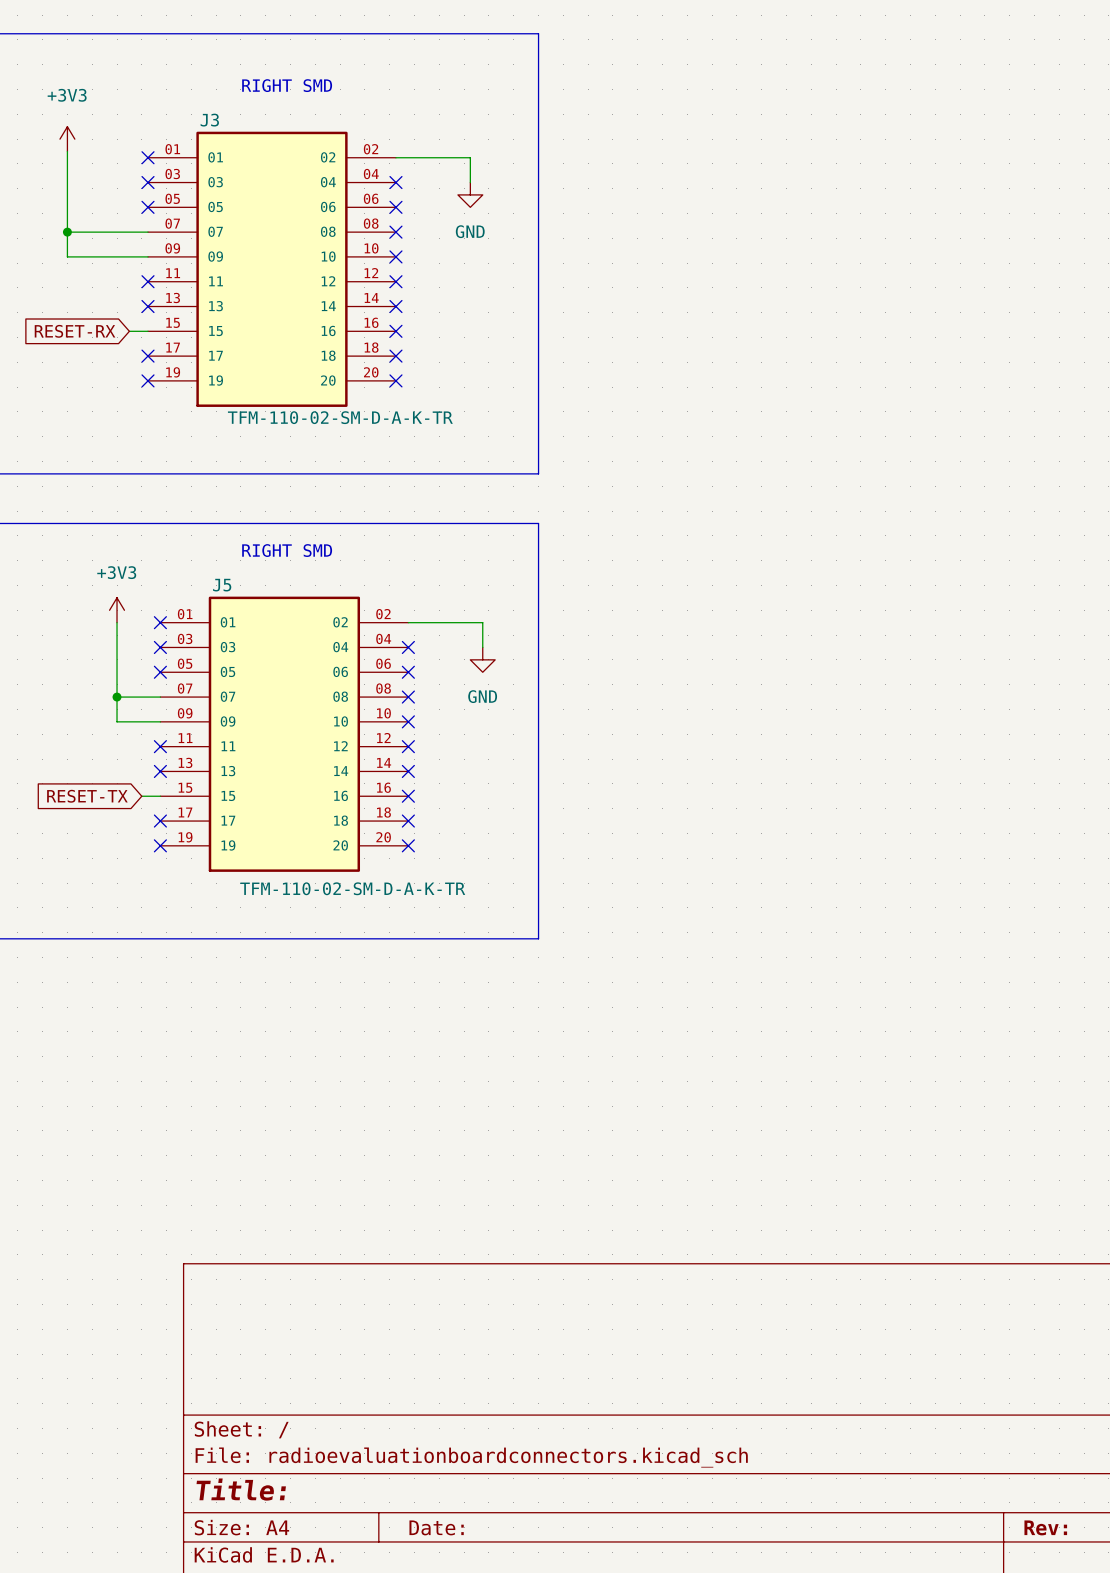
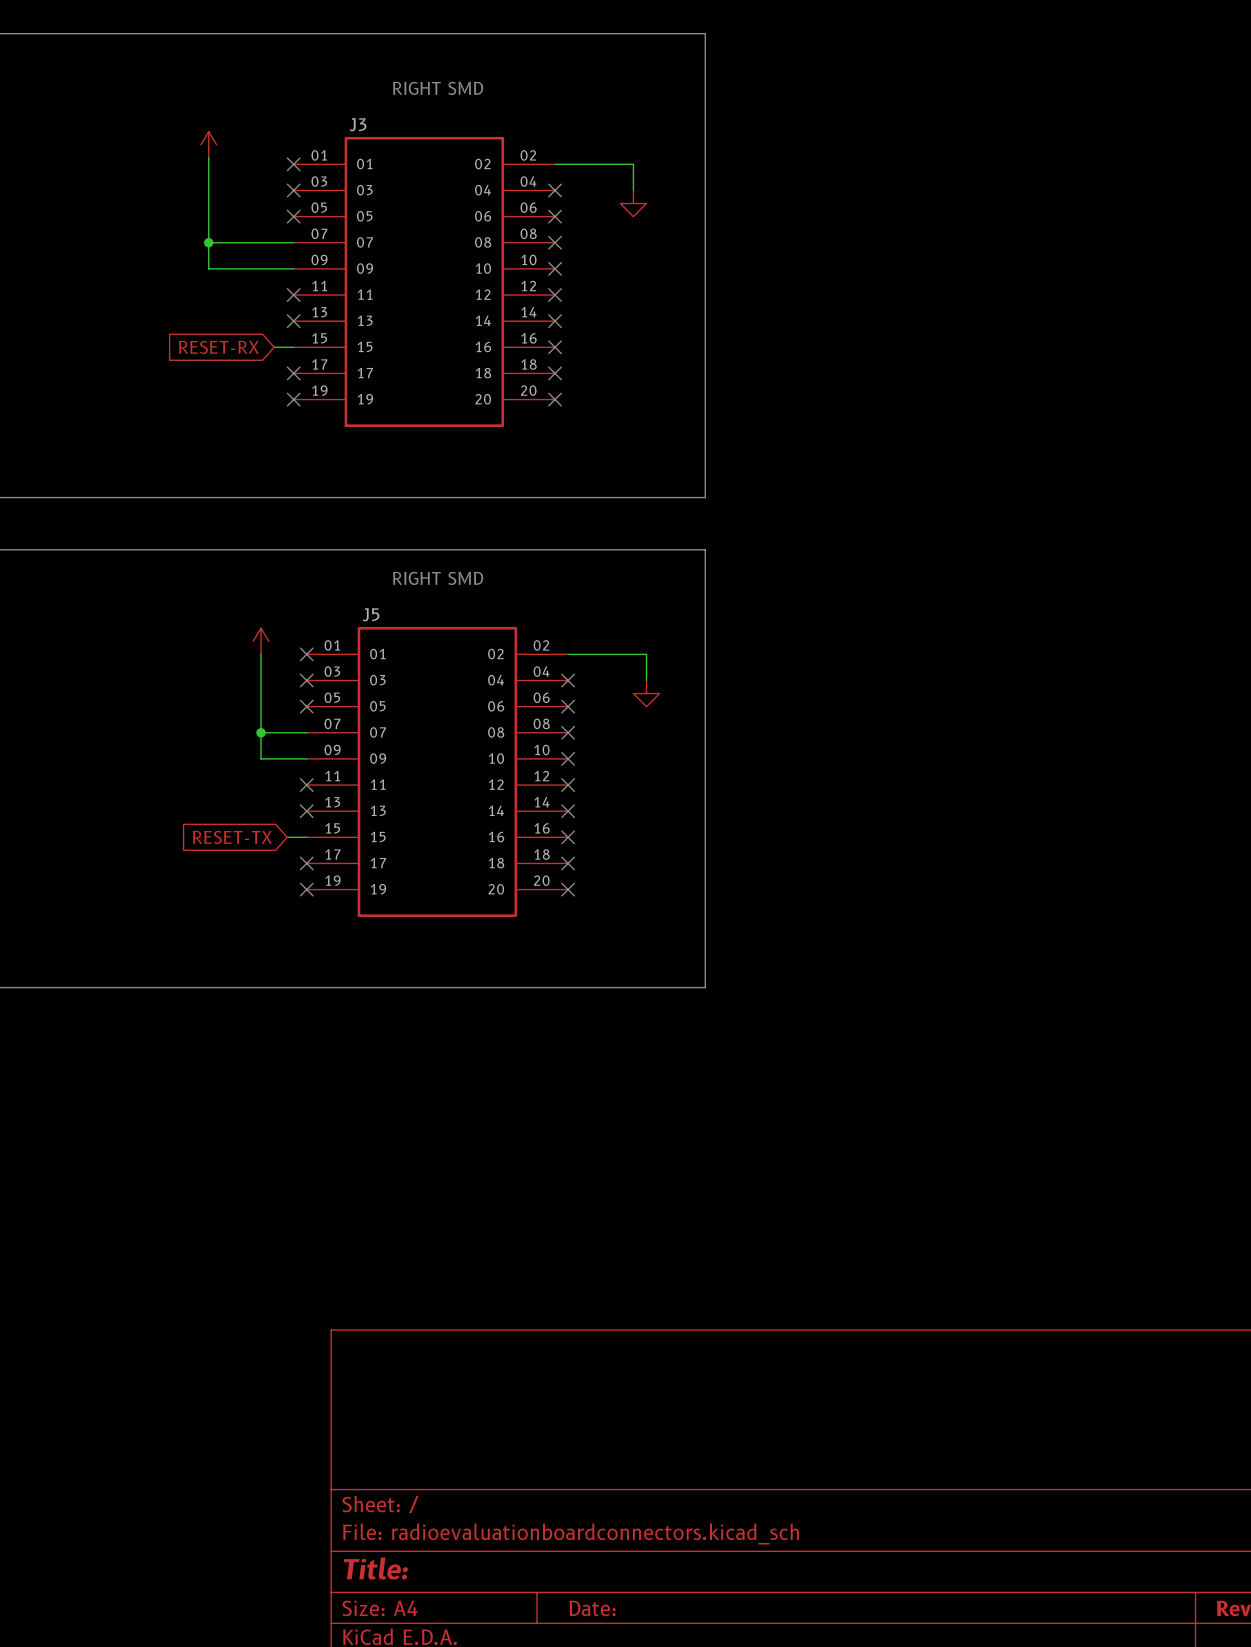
power symbol text: +3V3 (67, 95) -> none
power symbol text: GND (470, 231) -> none
J3 value: TFM-110-02-SM-D-A-K-TR (340, 417) -> none
power symbol text: +3V3 (116, 572) -> none
power symbol text: GND (482, 696) -> none
J5 value: TFM-110-02-SM-D-A-K-TR (352, 888) -> none

